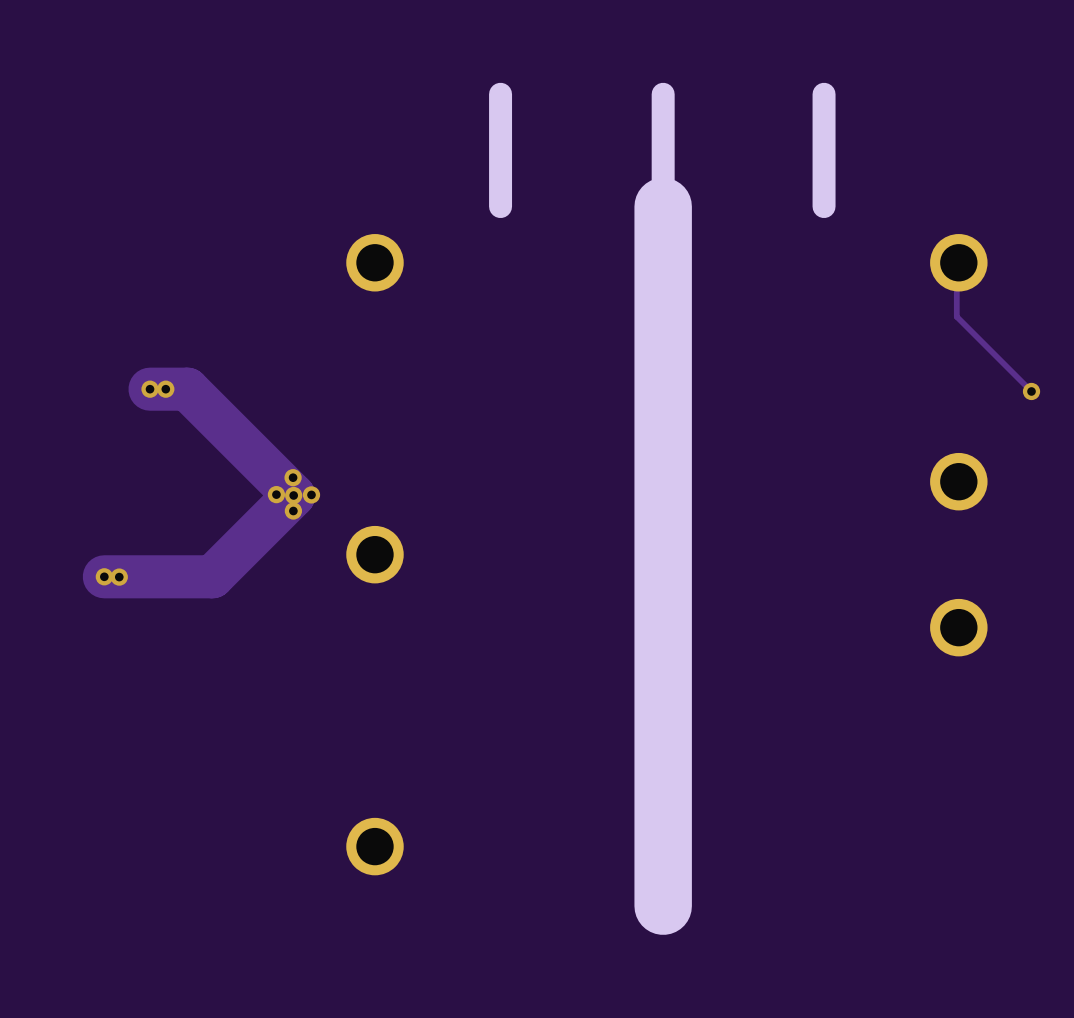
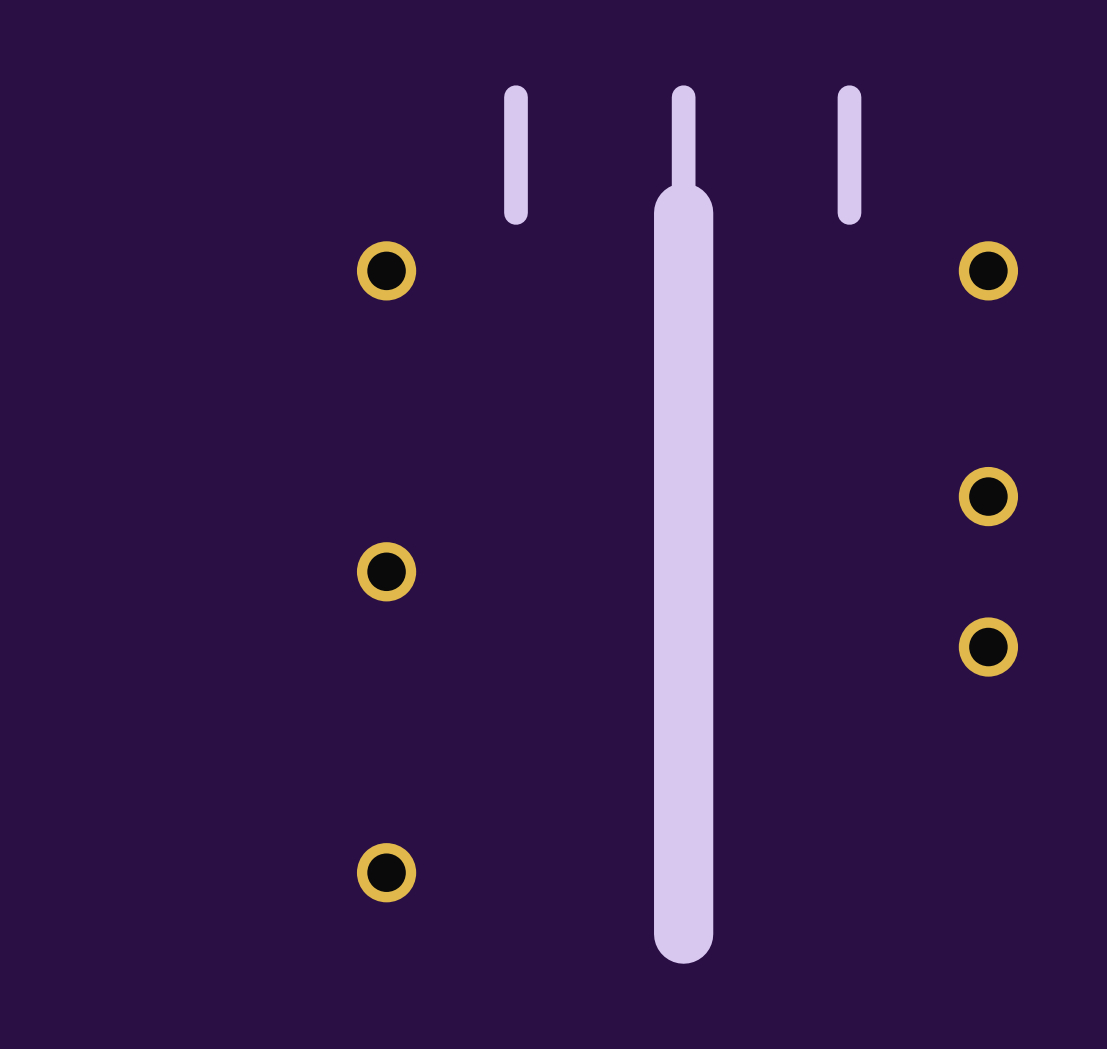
track: (958, 262) (956, 264) (956, 316) (1031, 391) -> none
track: (150, 389) (187, 389) (293, 495) (212, 576) (104, 576) -> none
via: (150, 389) -> none
via: (165, 389) -> none
via: (1031, 391) -> none
via: (293, 477) -> none
via: (276, 494) -> none
via: (311, 494) -> none
via: (293, 495) -> none
via: (293, 511) -> none
via: (104, 576) -> none
via: (119, 577) -> none

